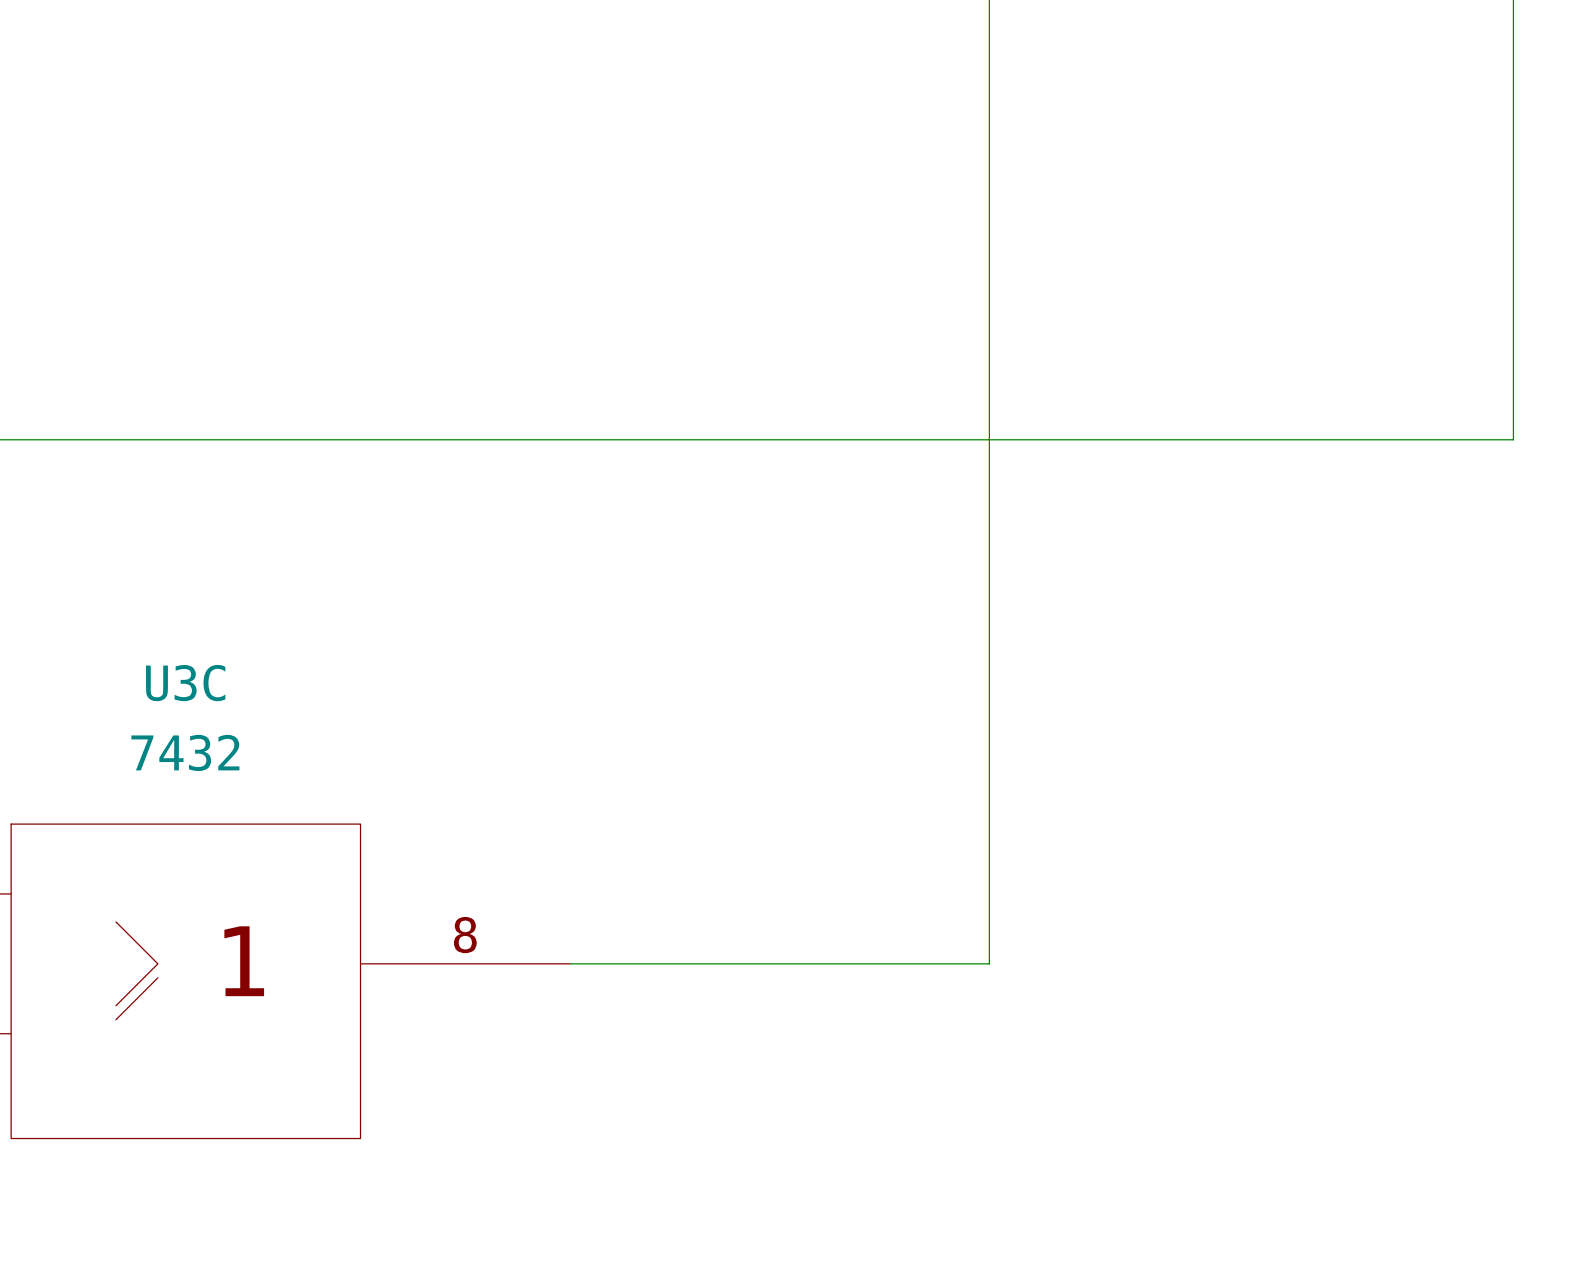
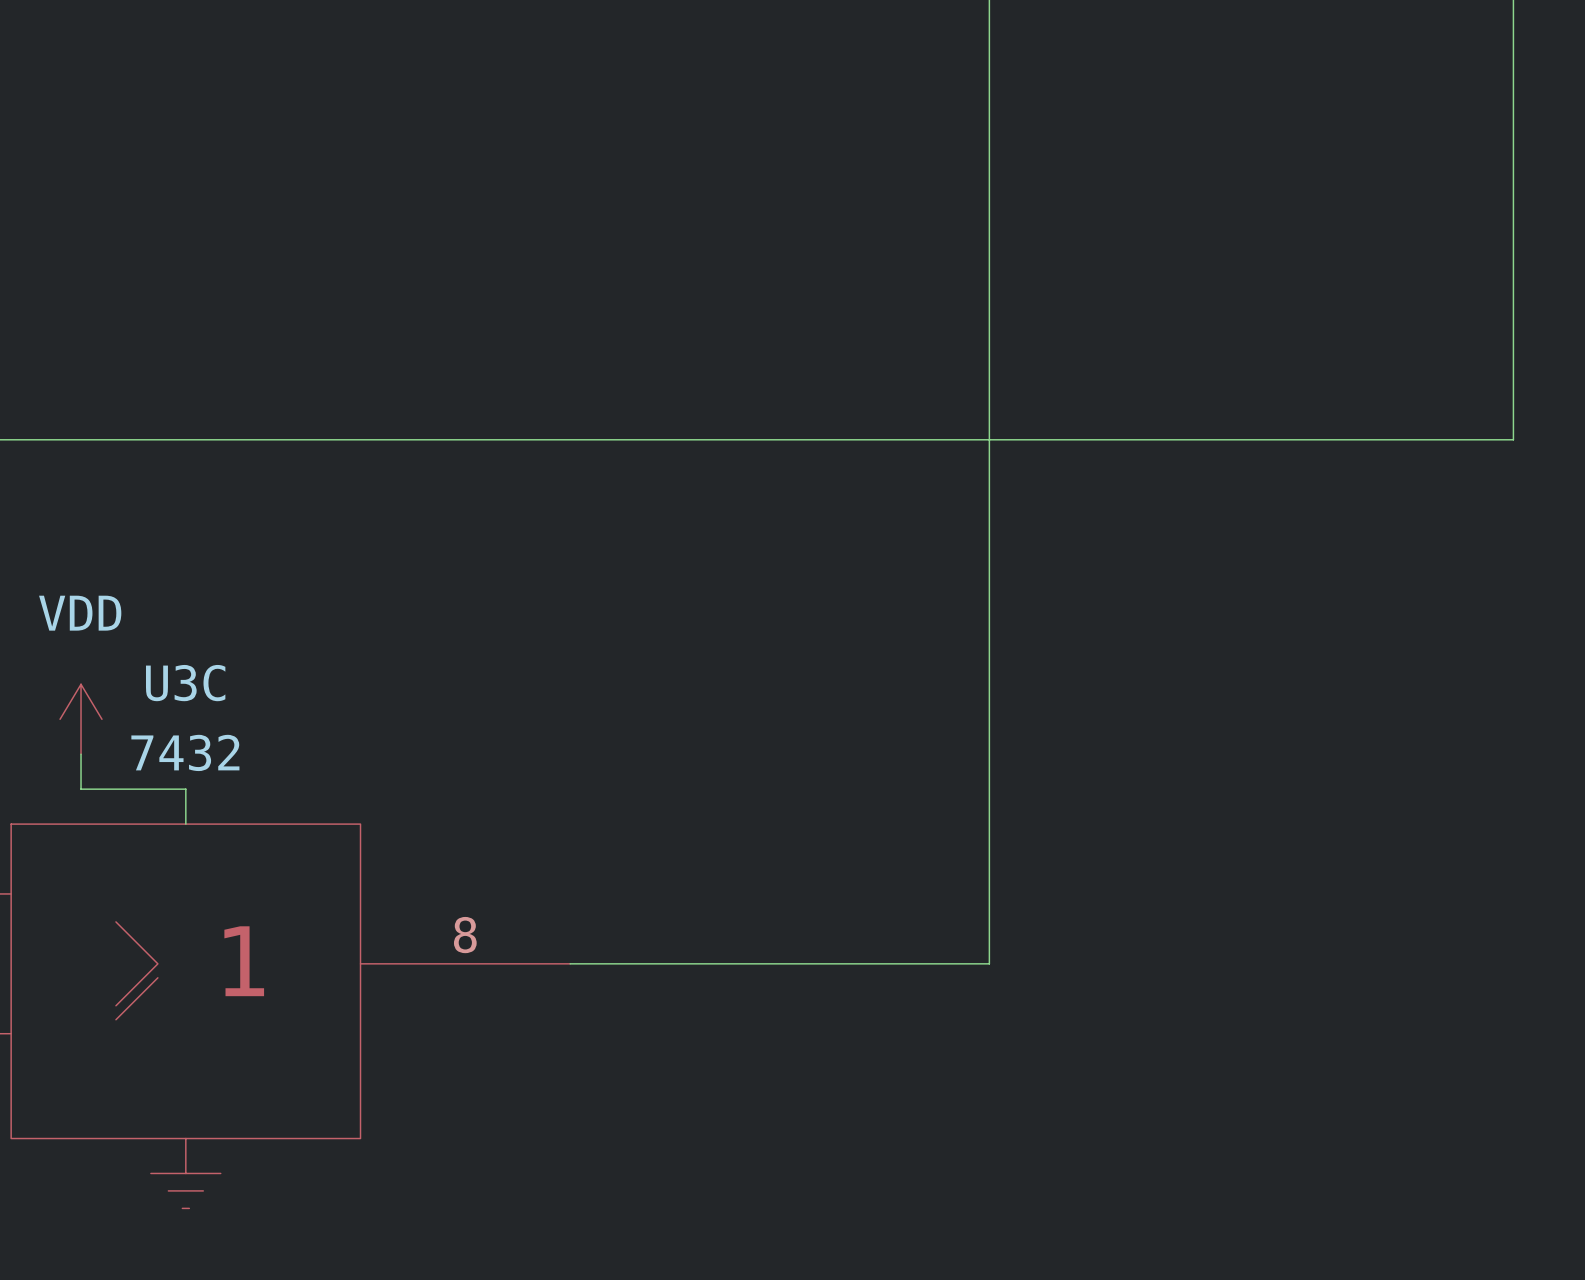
power symbol: none -> VDD (81, 719)
wire: none -> (81, 754) (81, 789) (185, 789) (185, 824)
power symbol: none -> (185, 1173)

